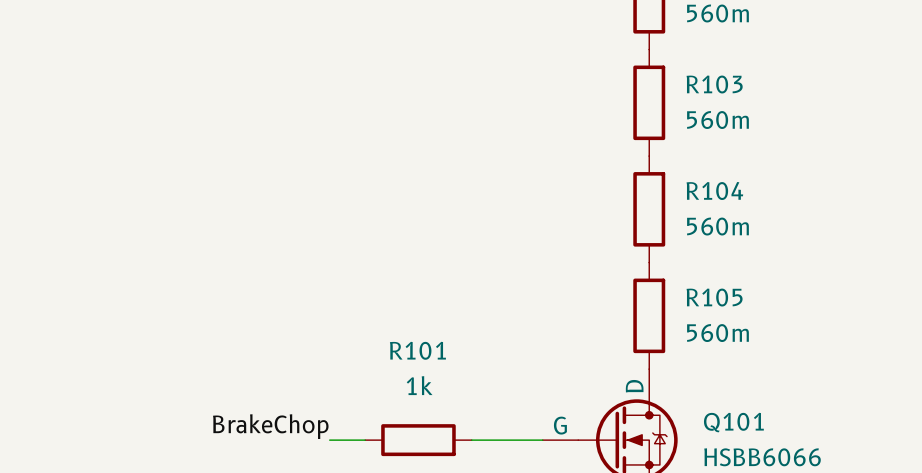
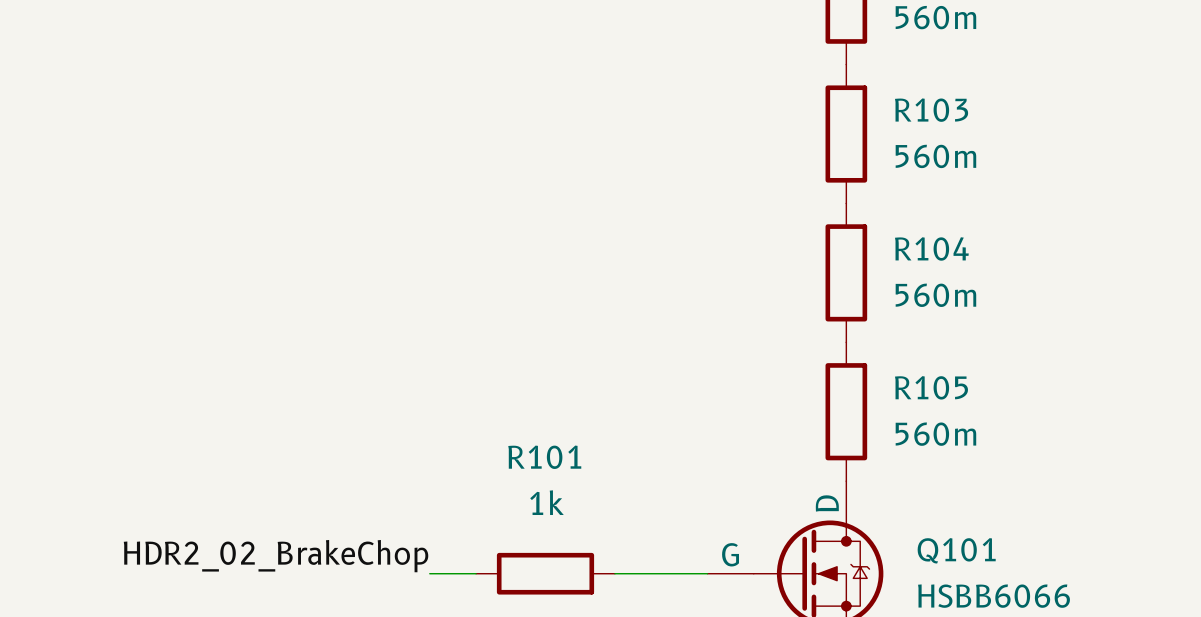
label: BrakeChop (270, 426) -> HDR2_02_BrakeChop (276, 556)

